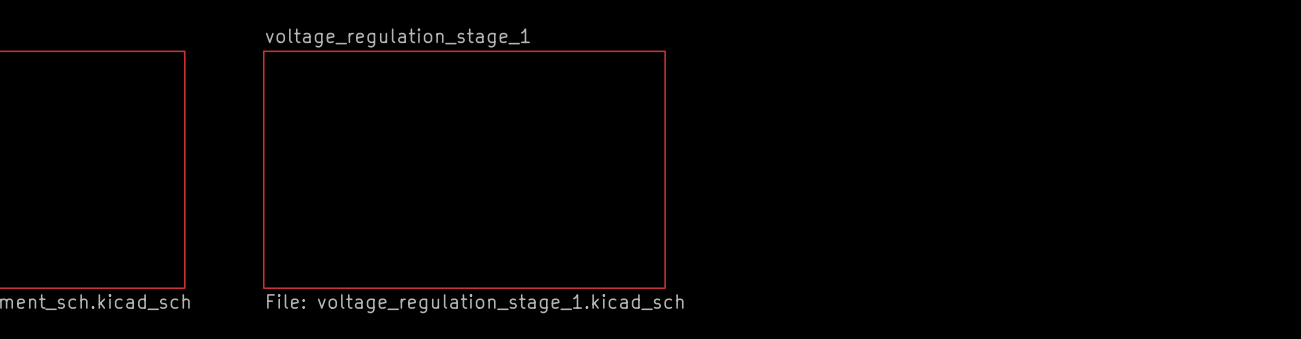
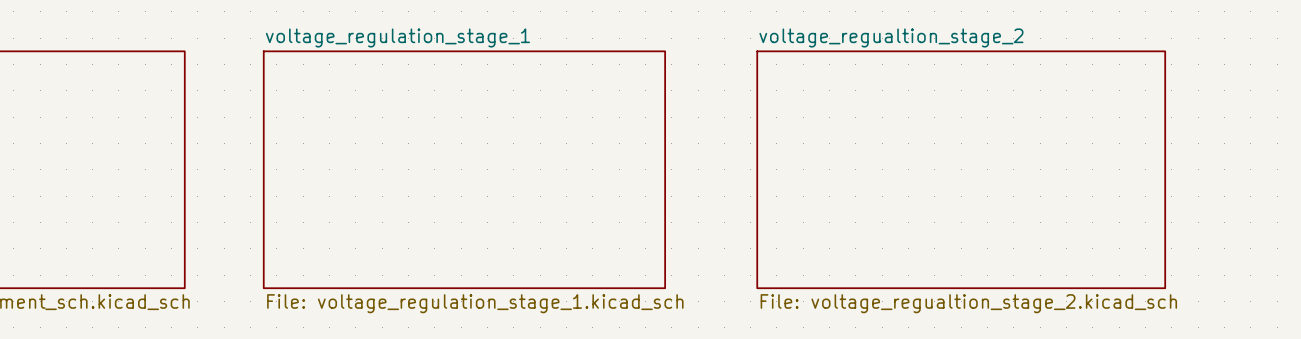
sheet voltage_regualtion_stage_2: none -> File: voltage_regualtion_stage_2.kicad_sch (961, 169)

